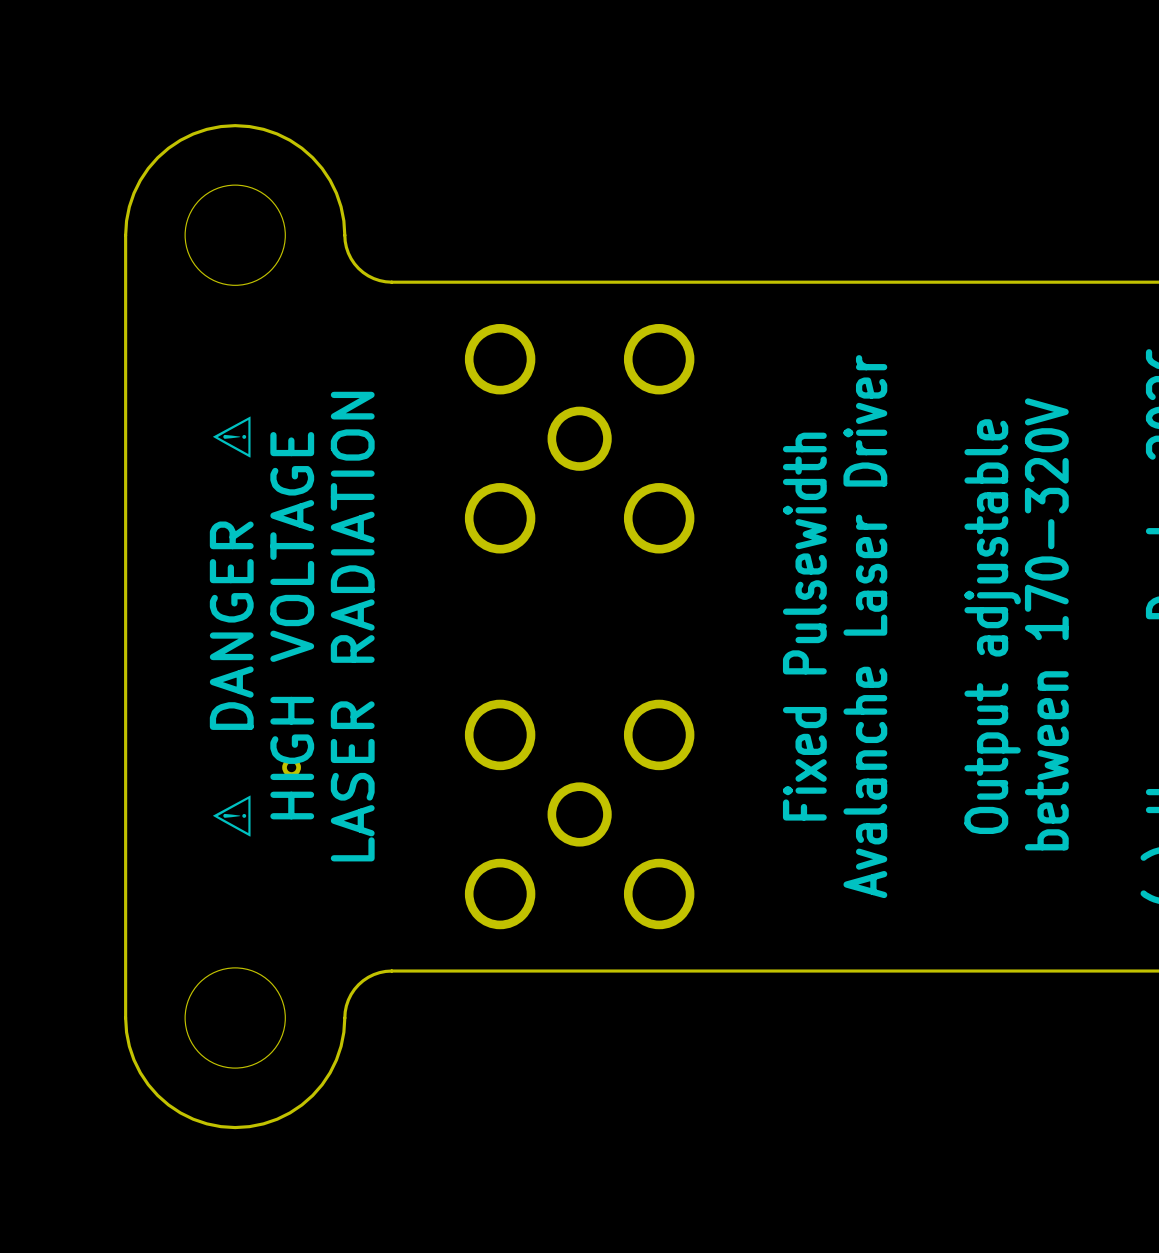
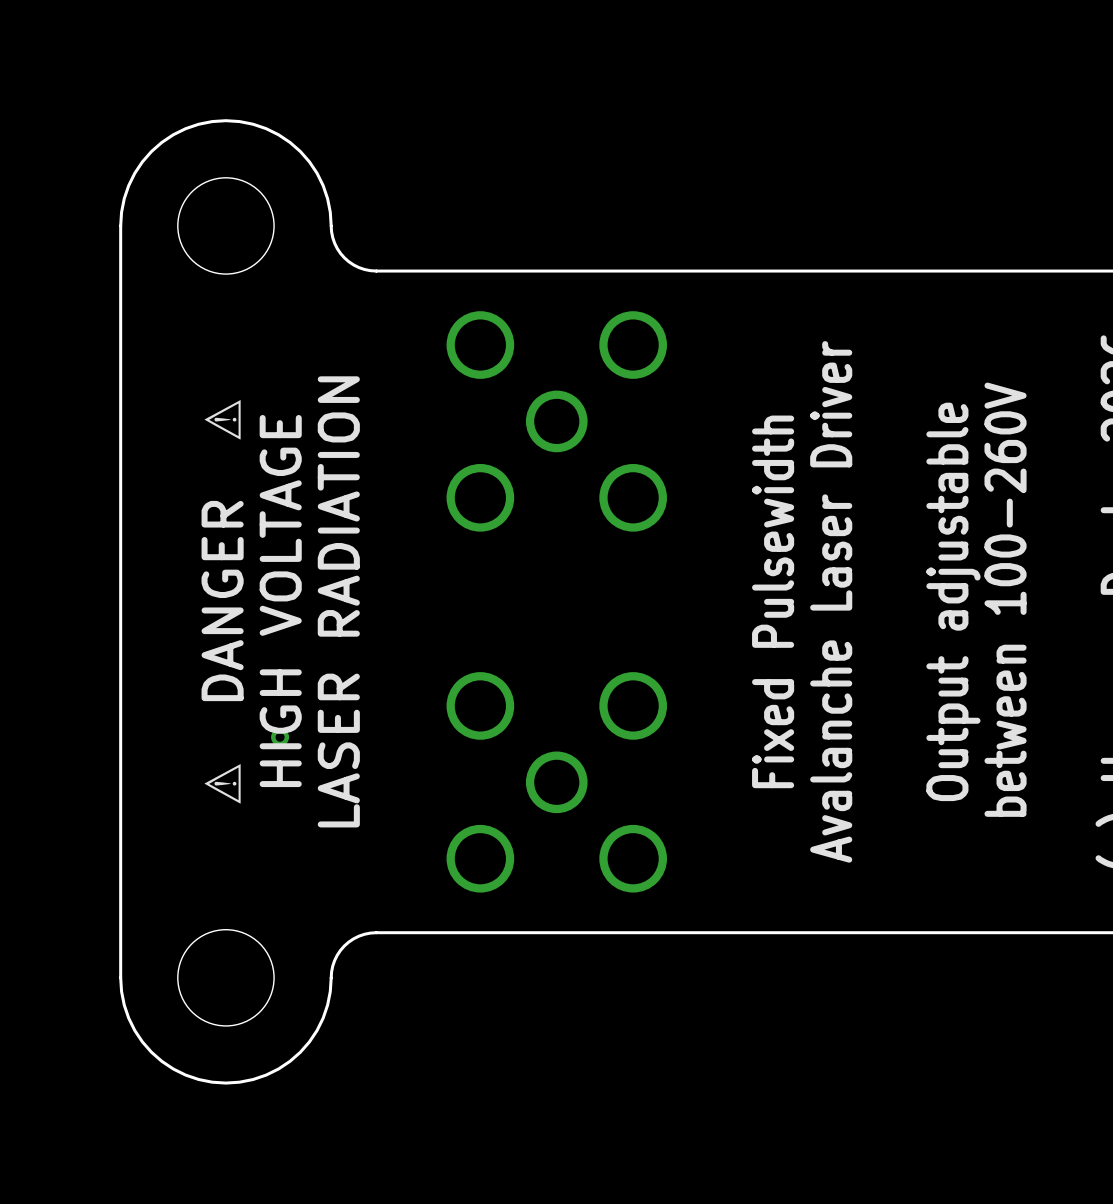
text: between 170-320V (1046, 624) -> between 100-260V (1005, 599)

